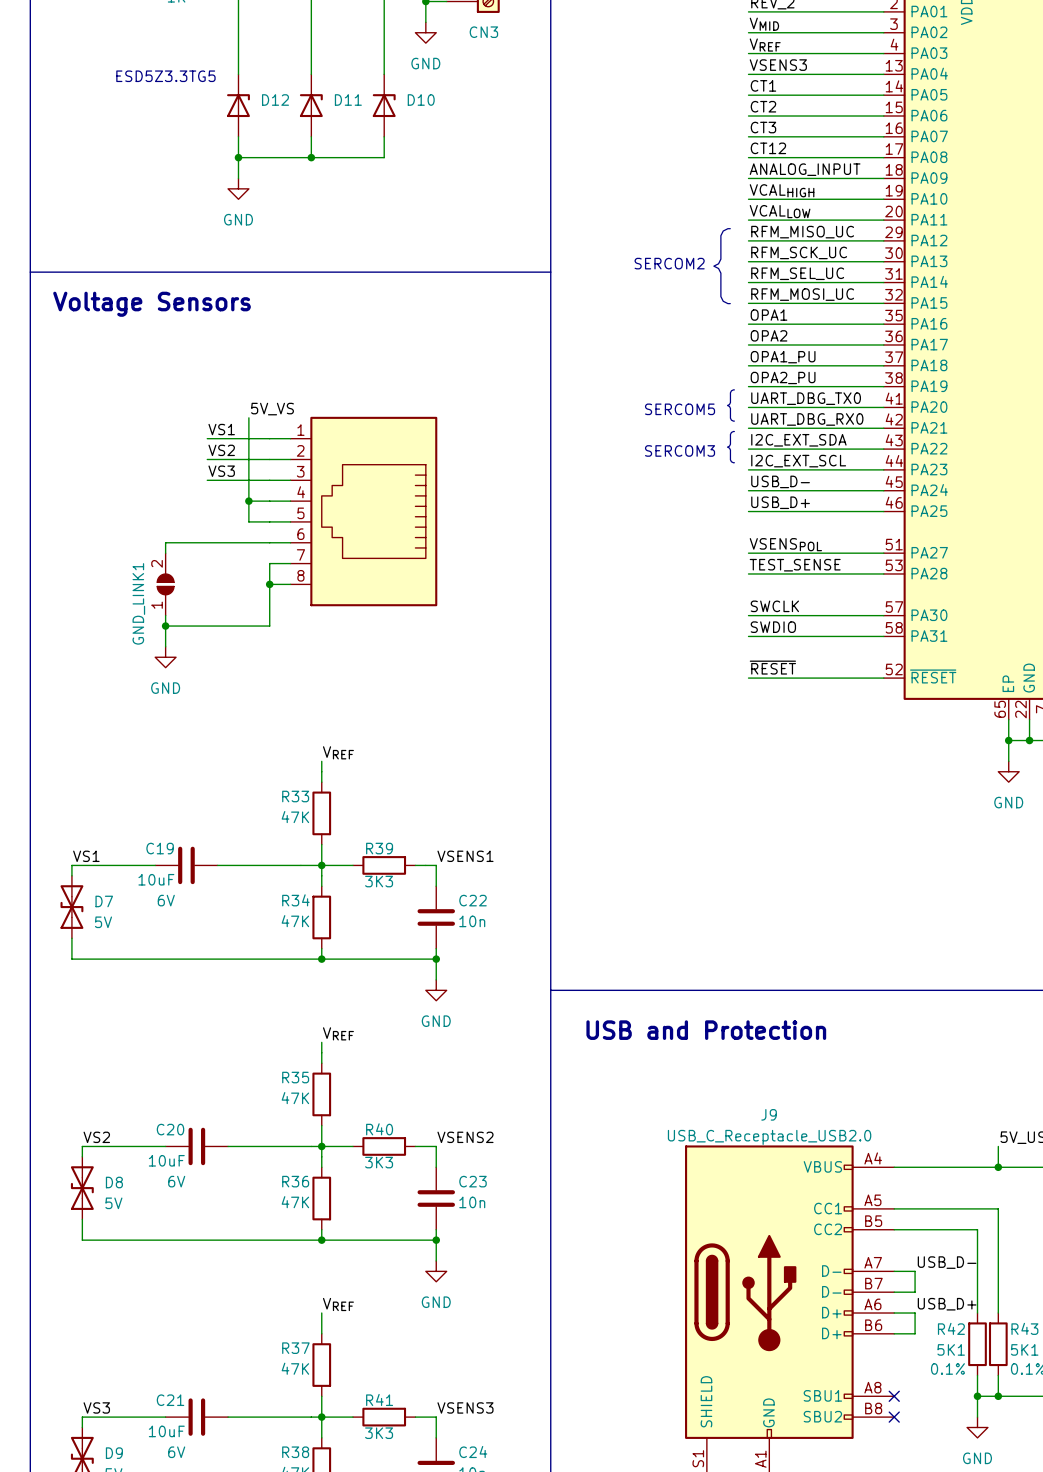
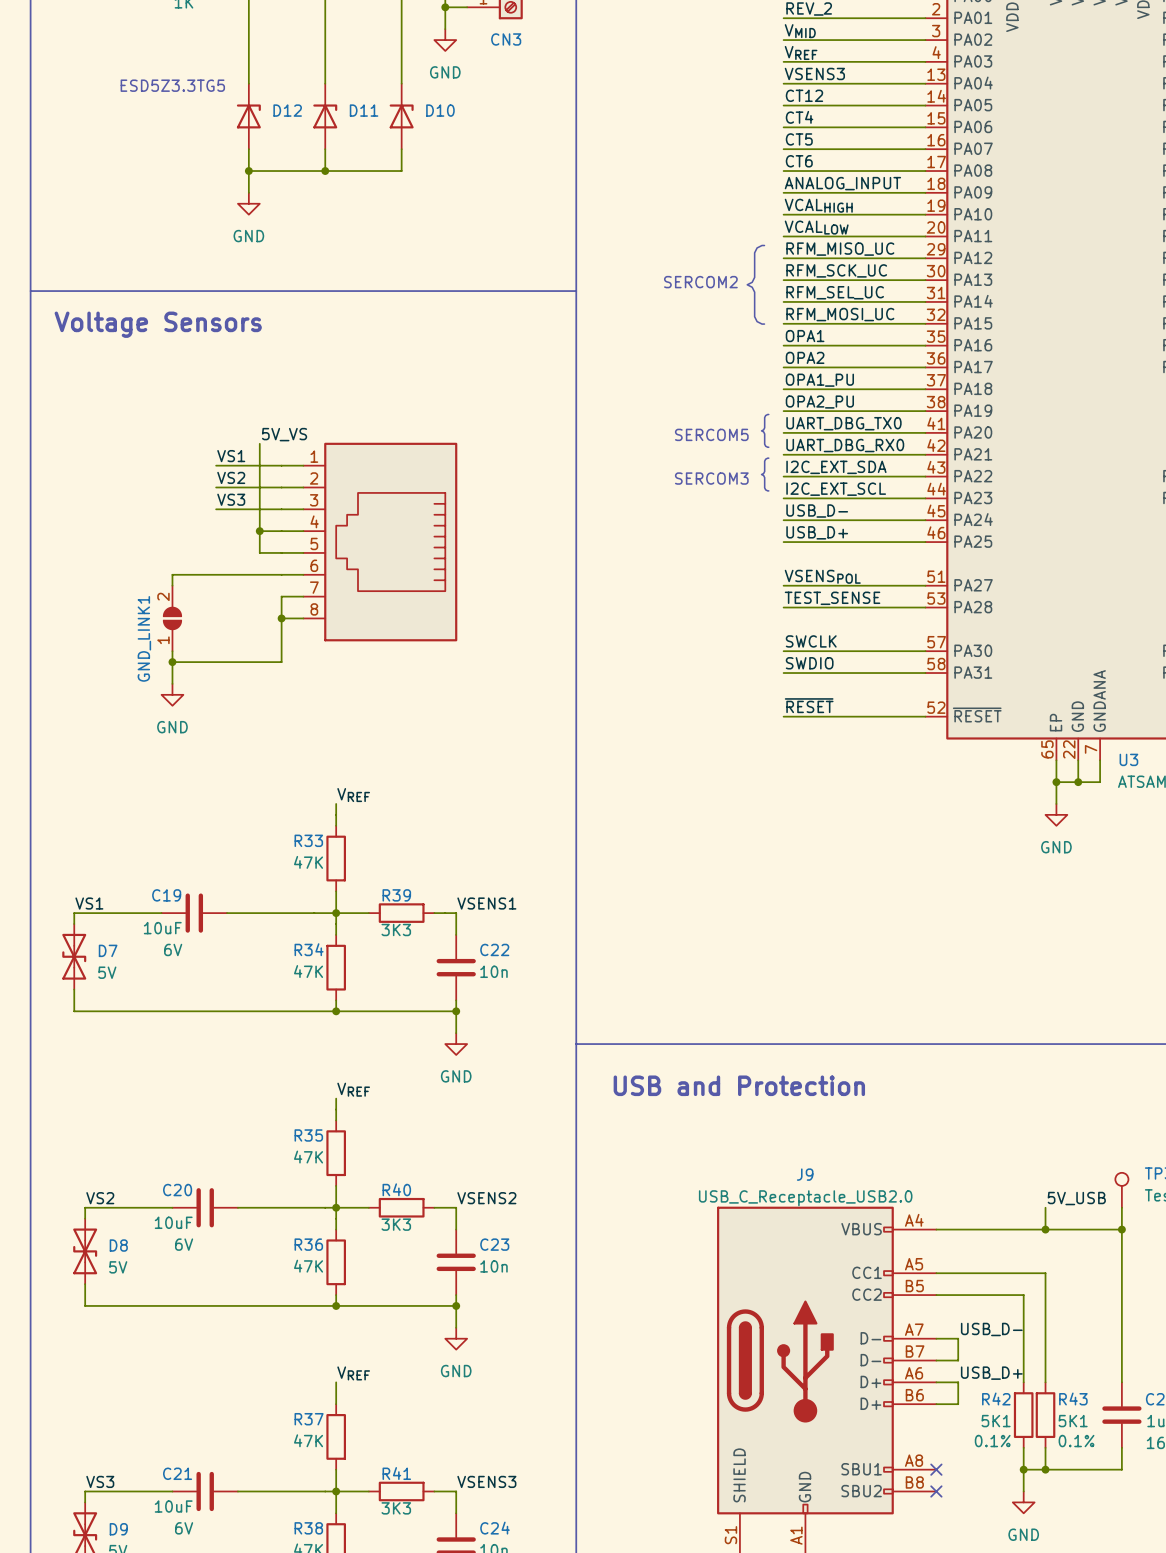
label: CT1 (763, 85) -> CT12 (804, 95)
label: CT2 (763, 106) -> CT4 (799, 117)
label: CT3 (763, 127) -> CT5 (799, 139)
label: CT12 (768, 148) -> CT6 (799, 161)

